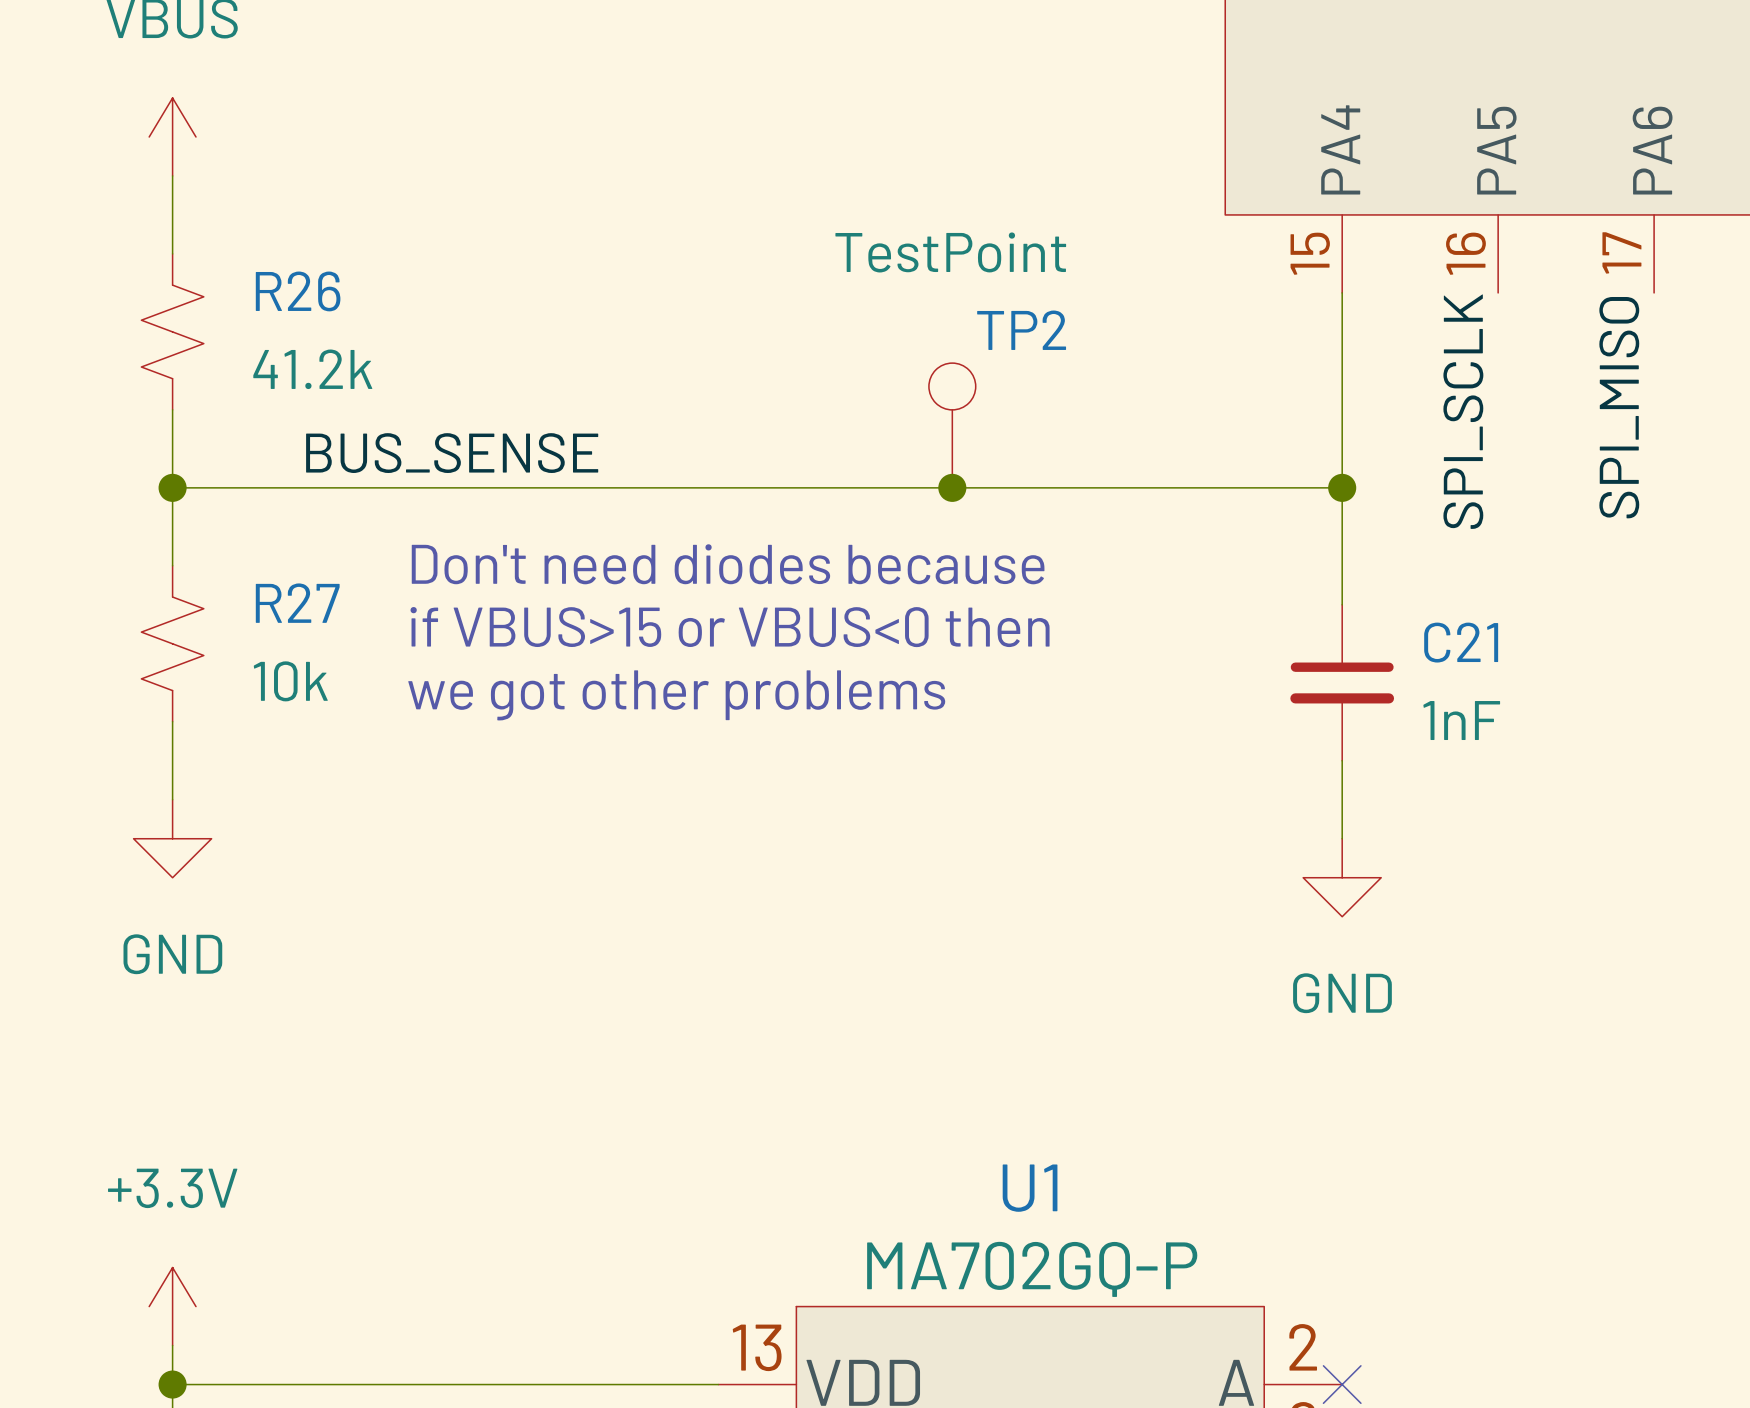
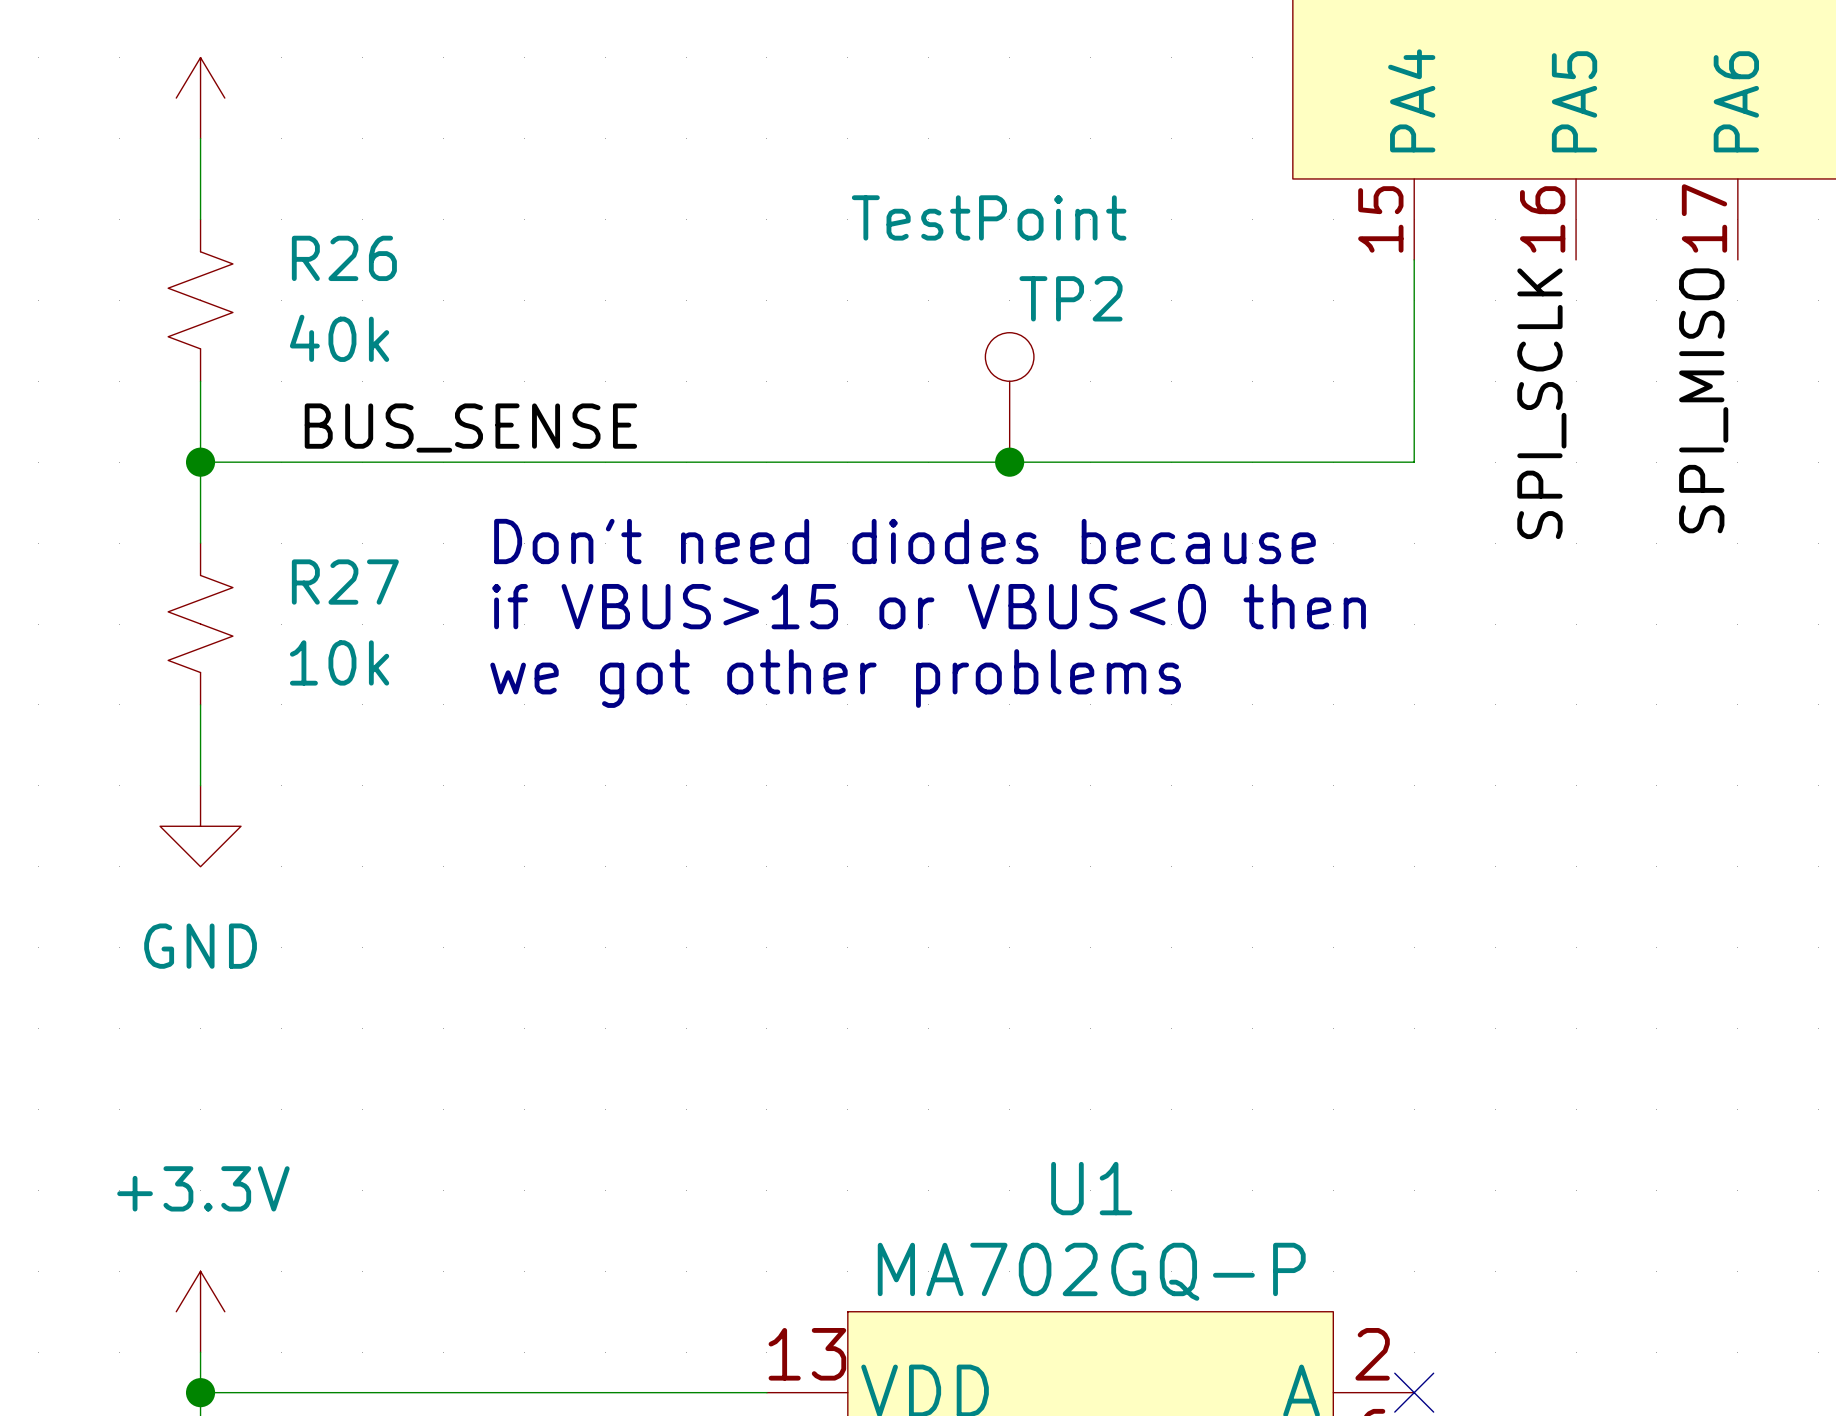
R26 value: 41.2k (312, 369) -> 40k (339, 338)
wire: (1342, 487) (1342, 604) -> none
junction: (1342, 487) -> none
text position: Don't need diodes because (728, 564) -> Don't need diodes because (904, 541)
text position: if VBUS>15 or VBUS<0 then (730, 627) -> if VBUS>15 or VBUS<0 then (929, 606)
C21: 1nF (1342, 682) -> none
text position: we got other problems (676, 695) -> we got other problems (835, 678)
wire: (1342, 760) (1342, 838) -> none
power symbol: GND (1342, 877) -> none

